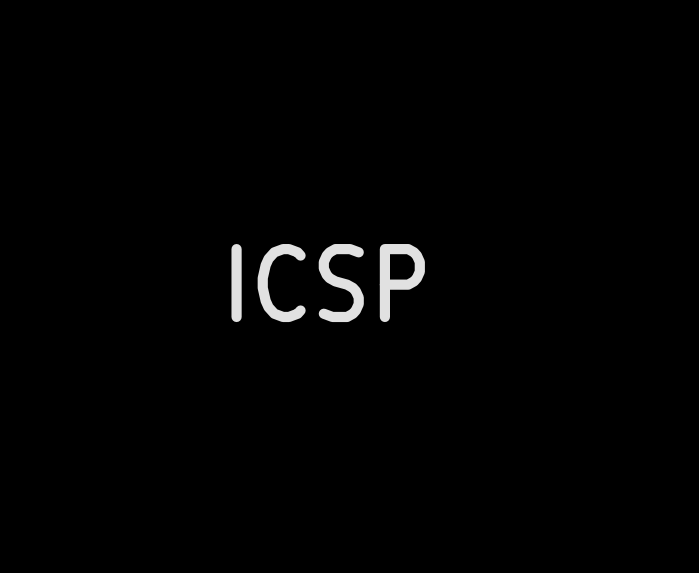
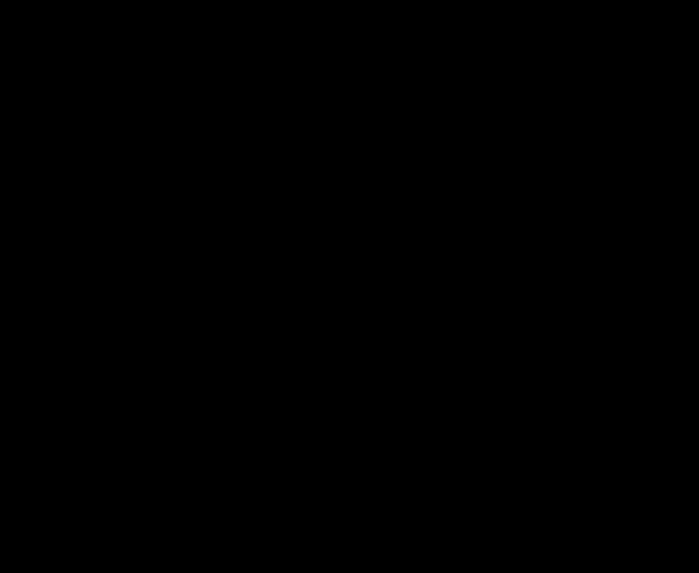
text: ICSP (328, 283) -> none

